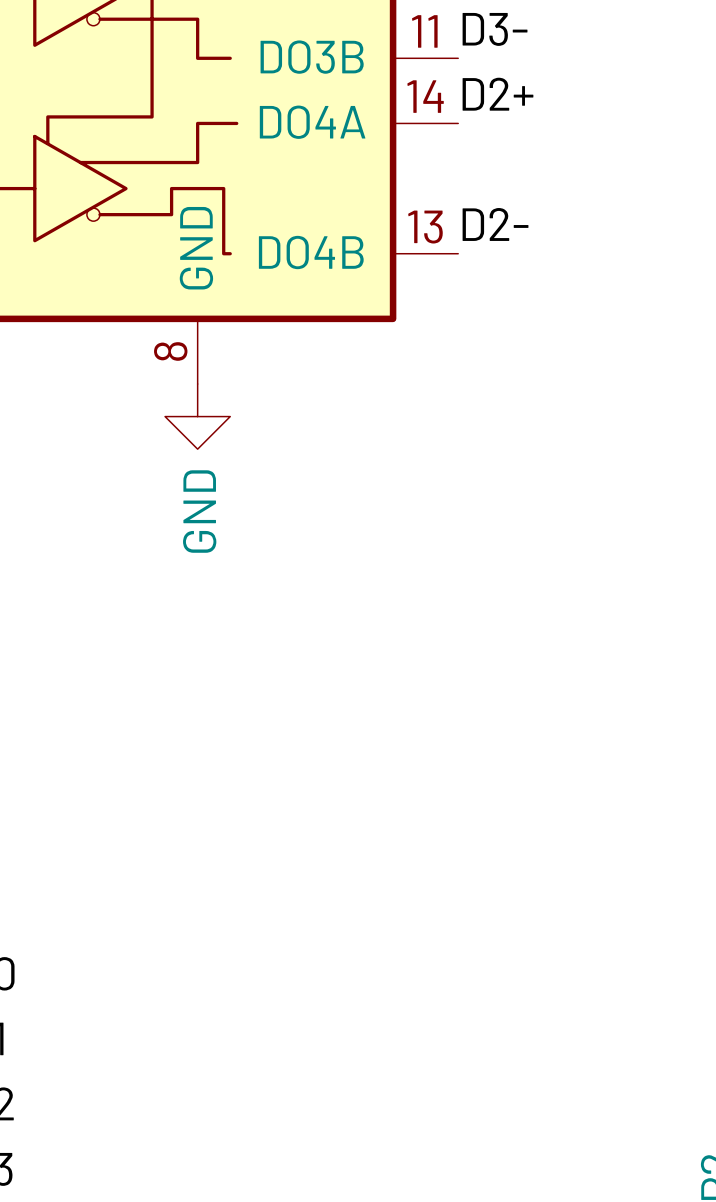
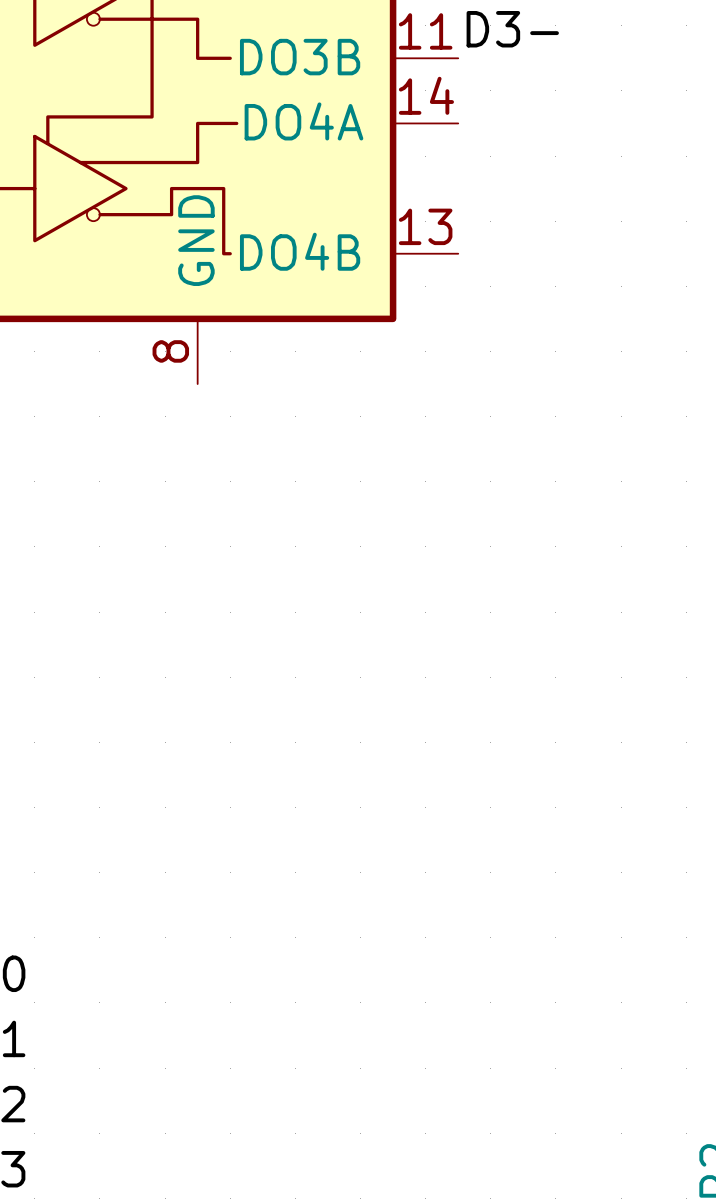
label: D2+ (497, 94) -> none
label: D2- (495, 224) -> none
power symbol: GND (197, 416) -> none

